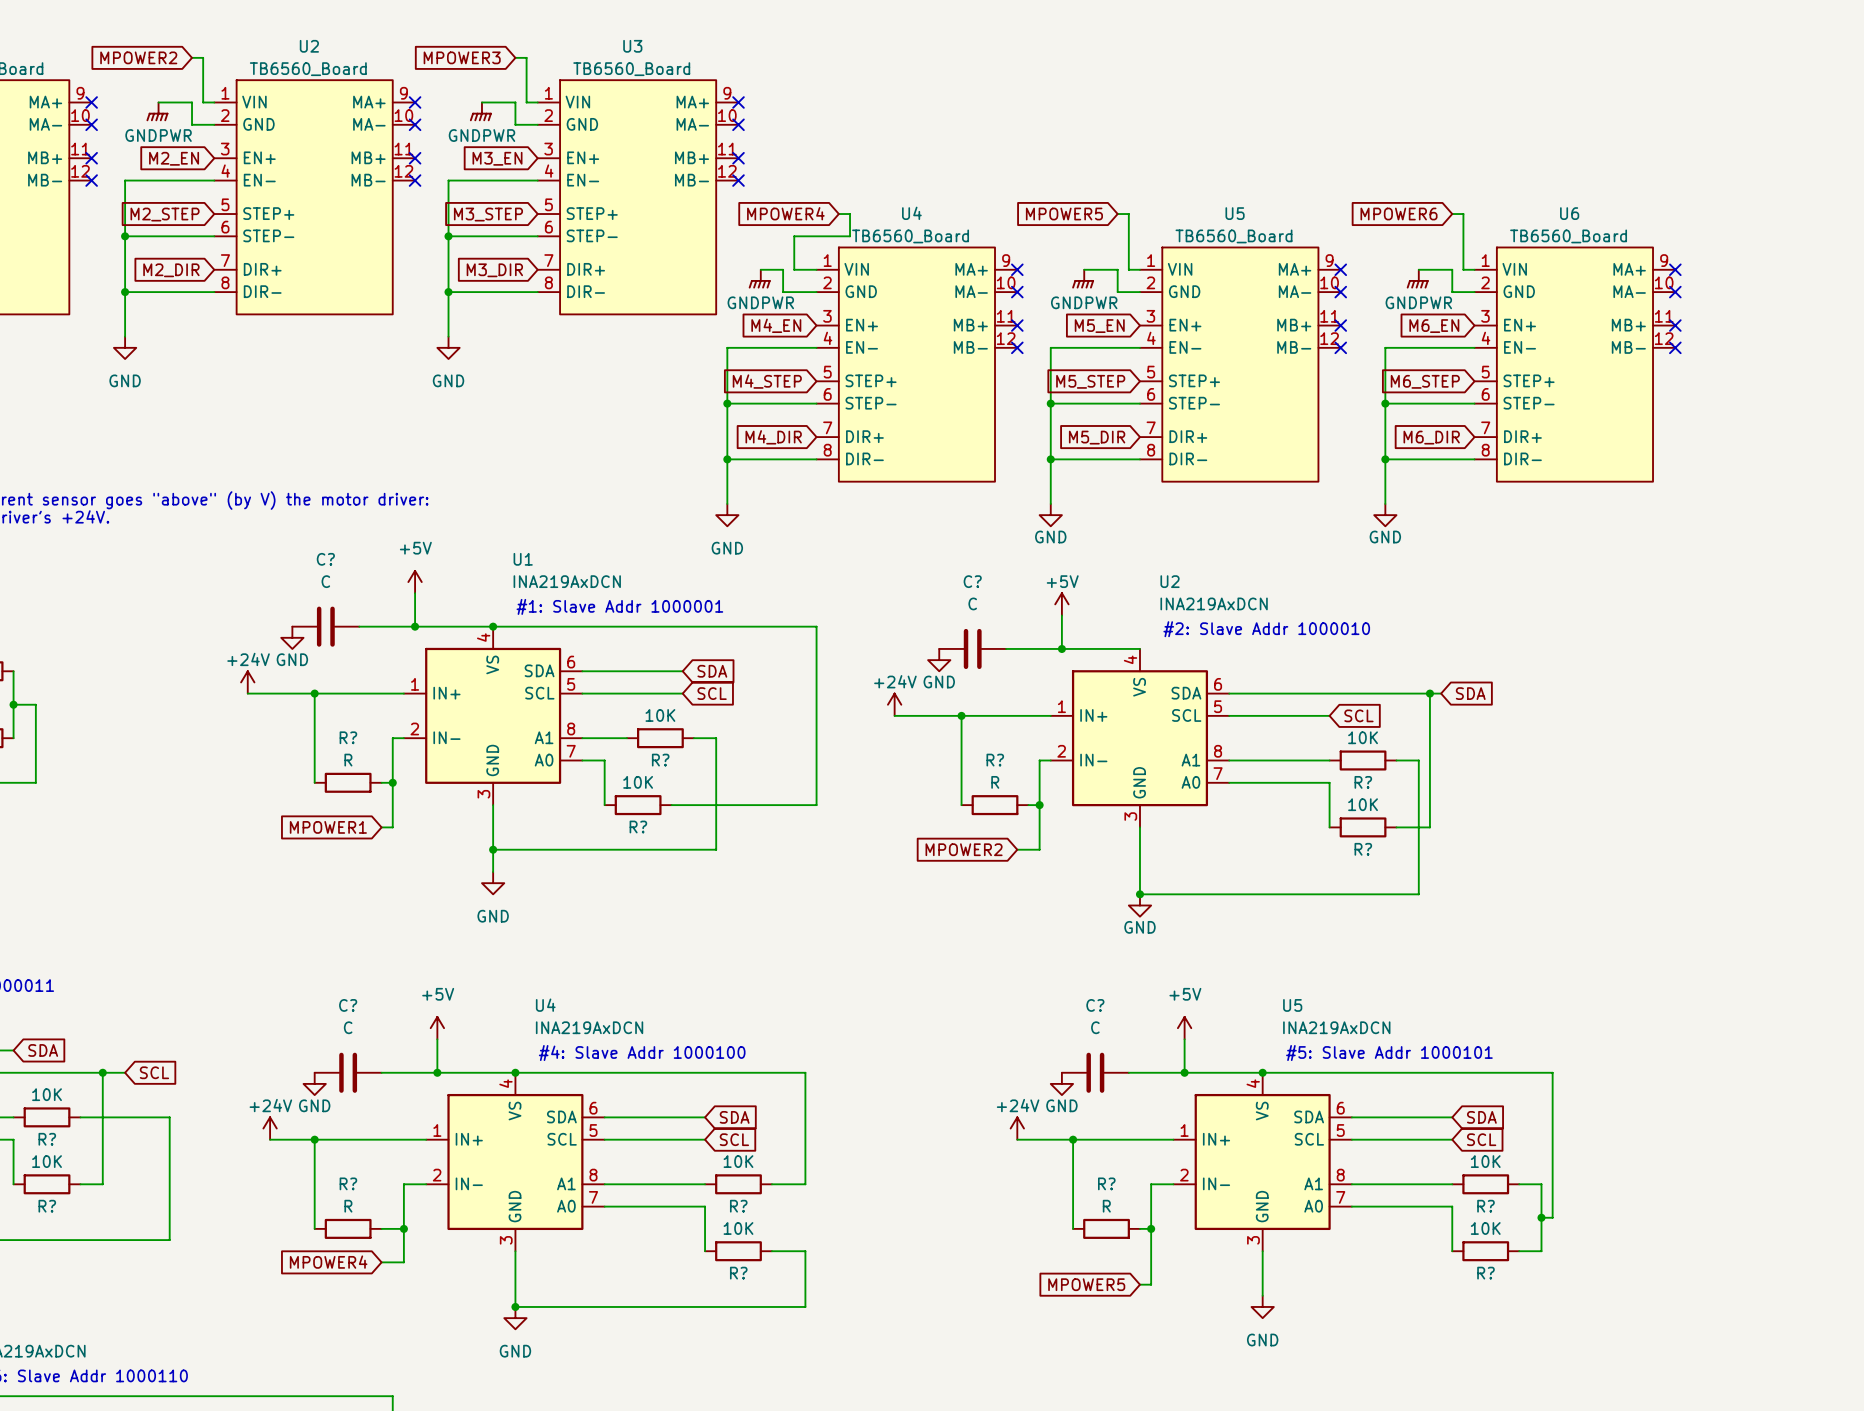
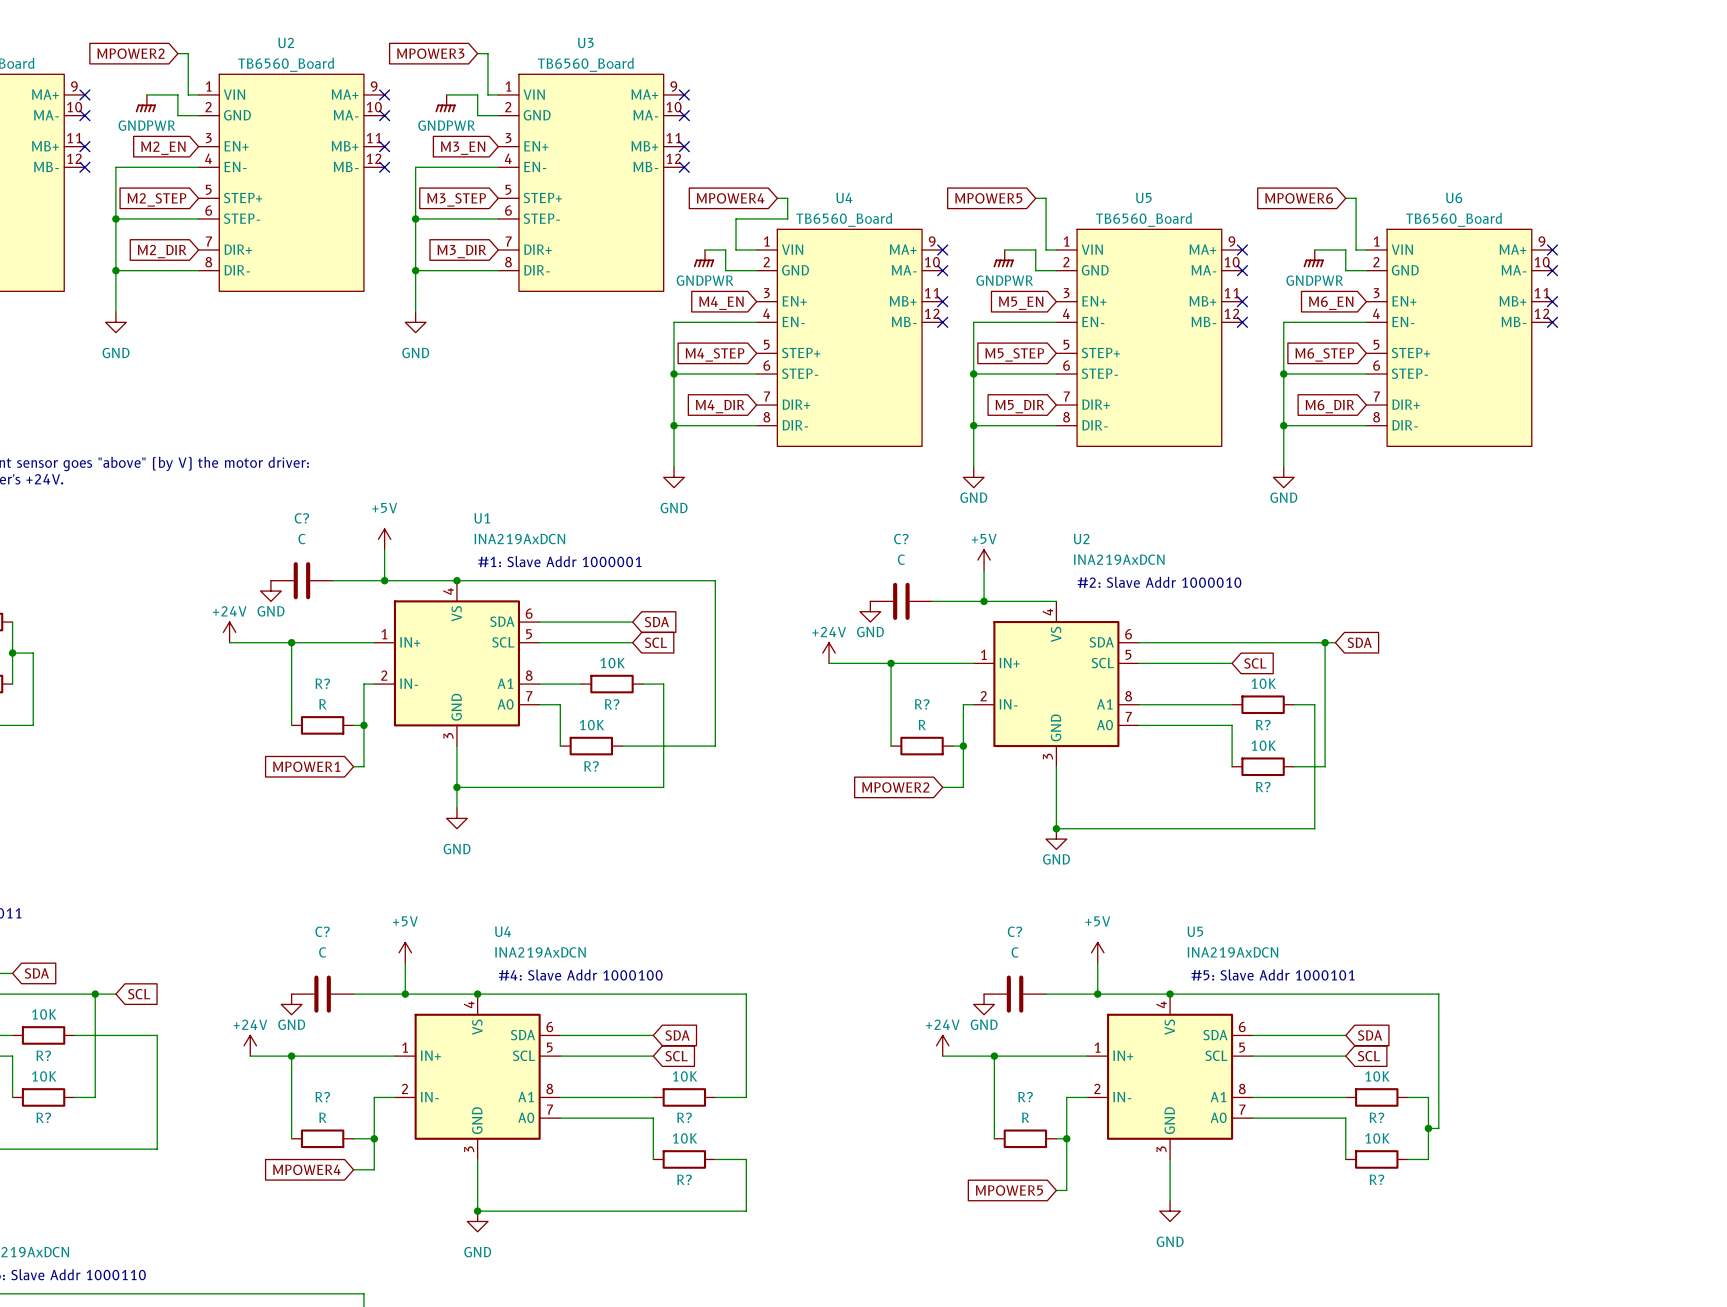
wire: (771, 626) (816, 626) (816, 805) (771, 805) -> (715, 580) (715, 746)

